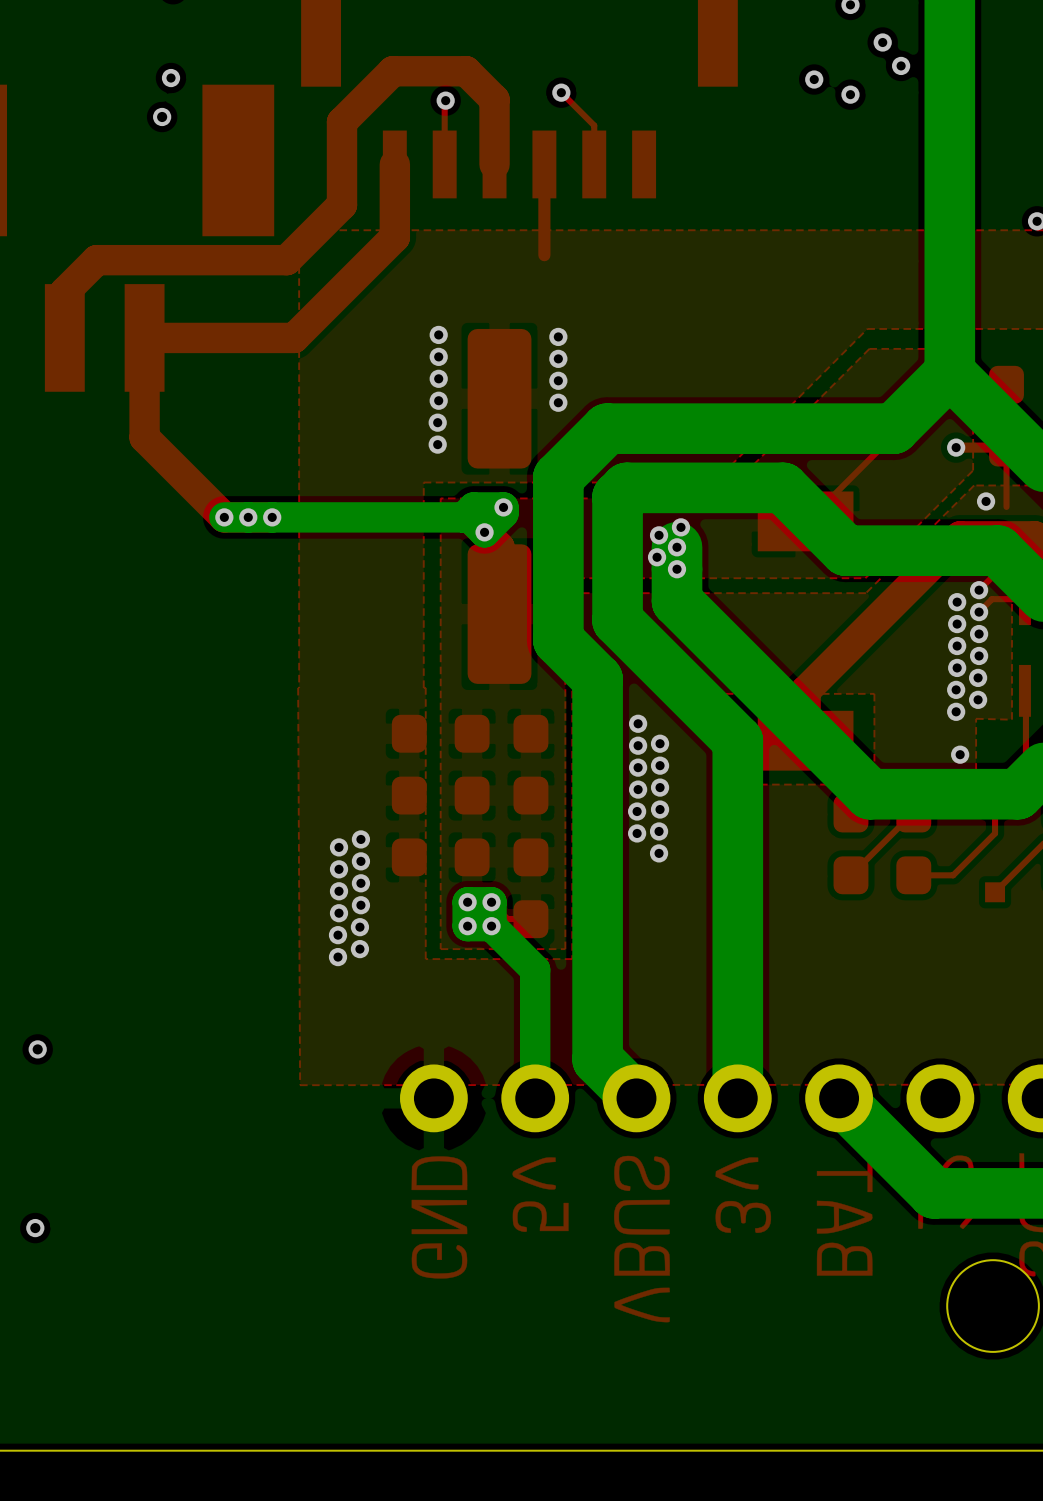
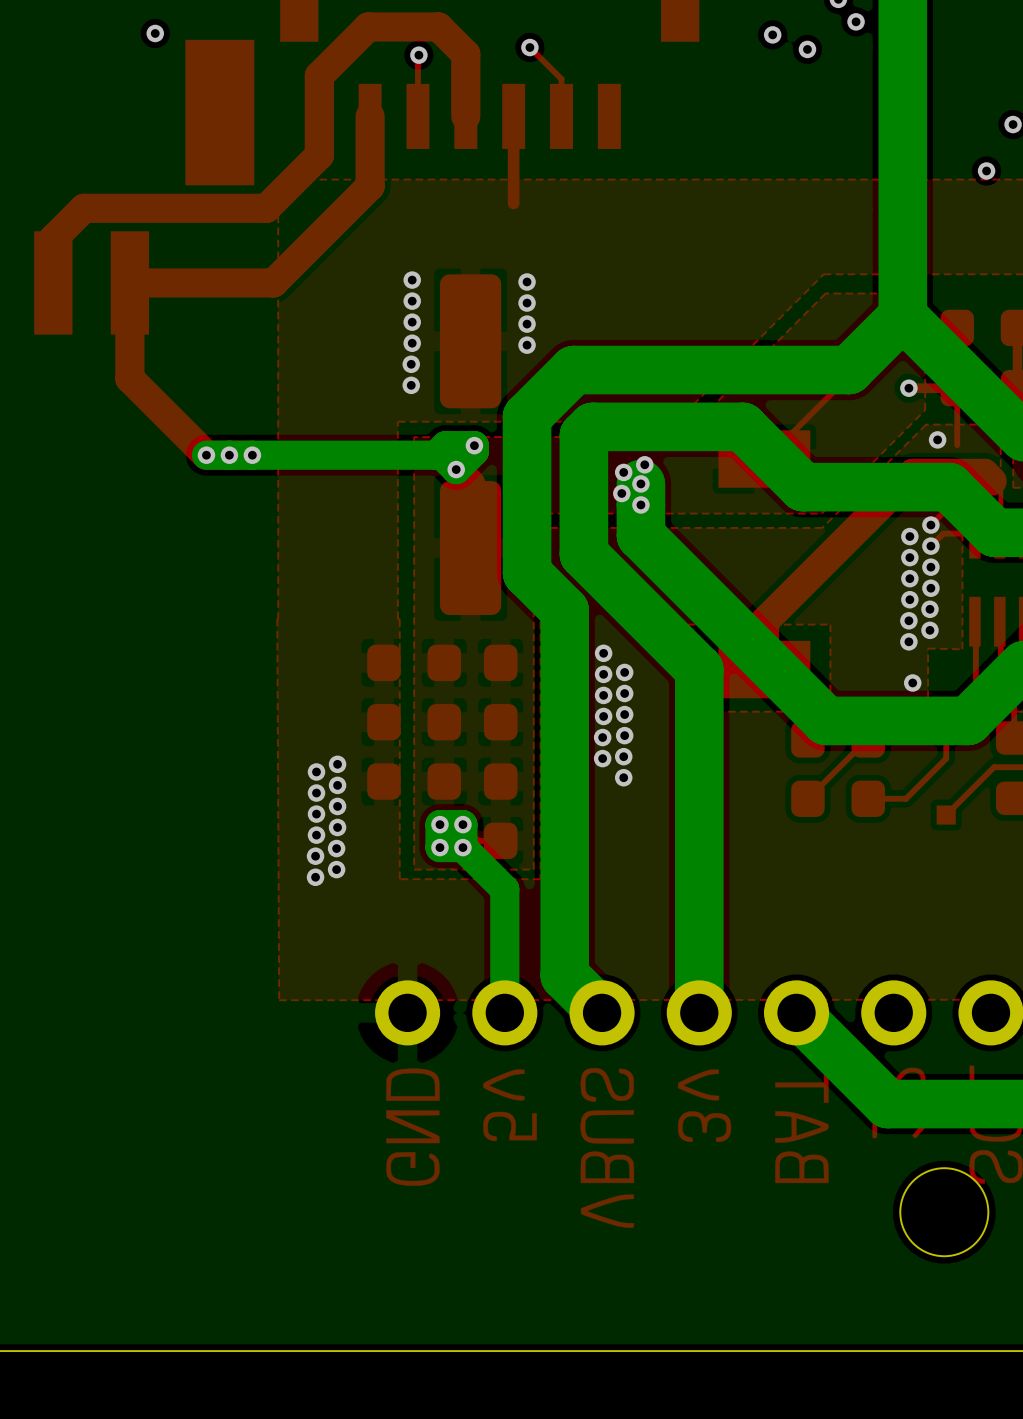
via: (162, 116) -> none
via: (37, 1049) -> none
via: (35, 1228) -> none

